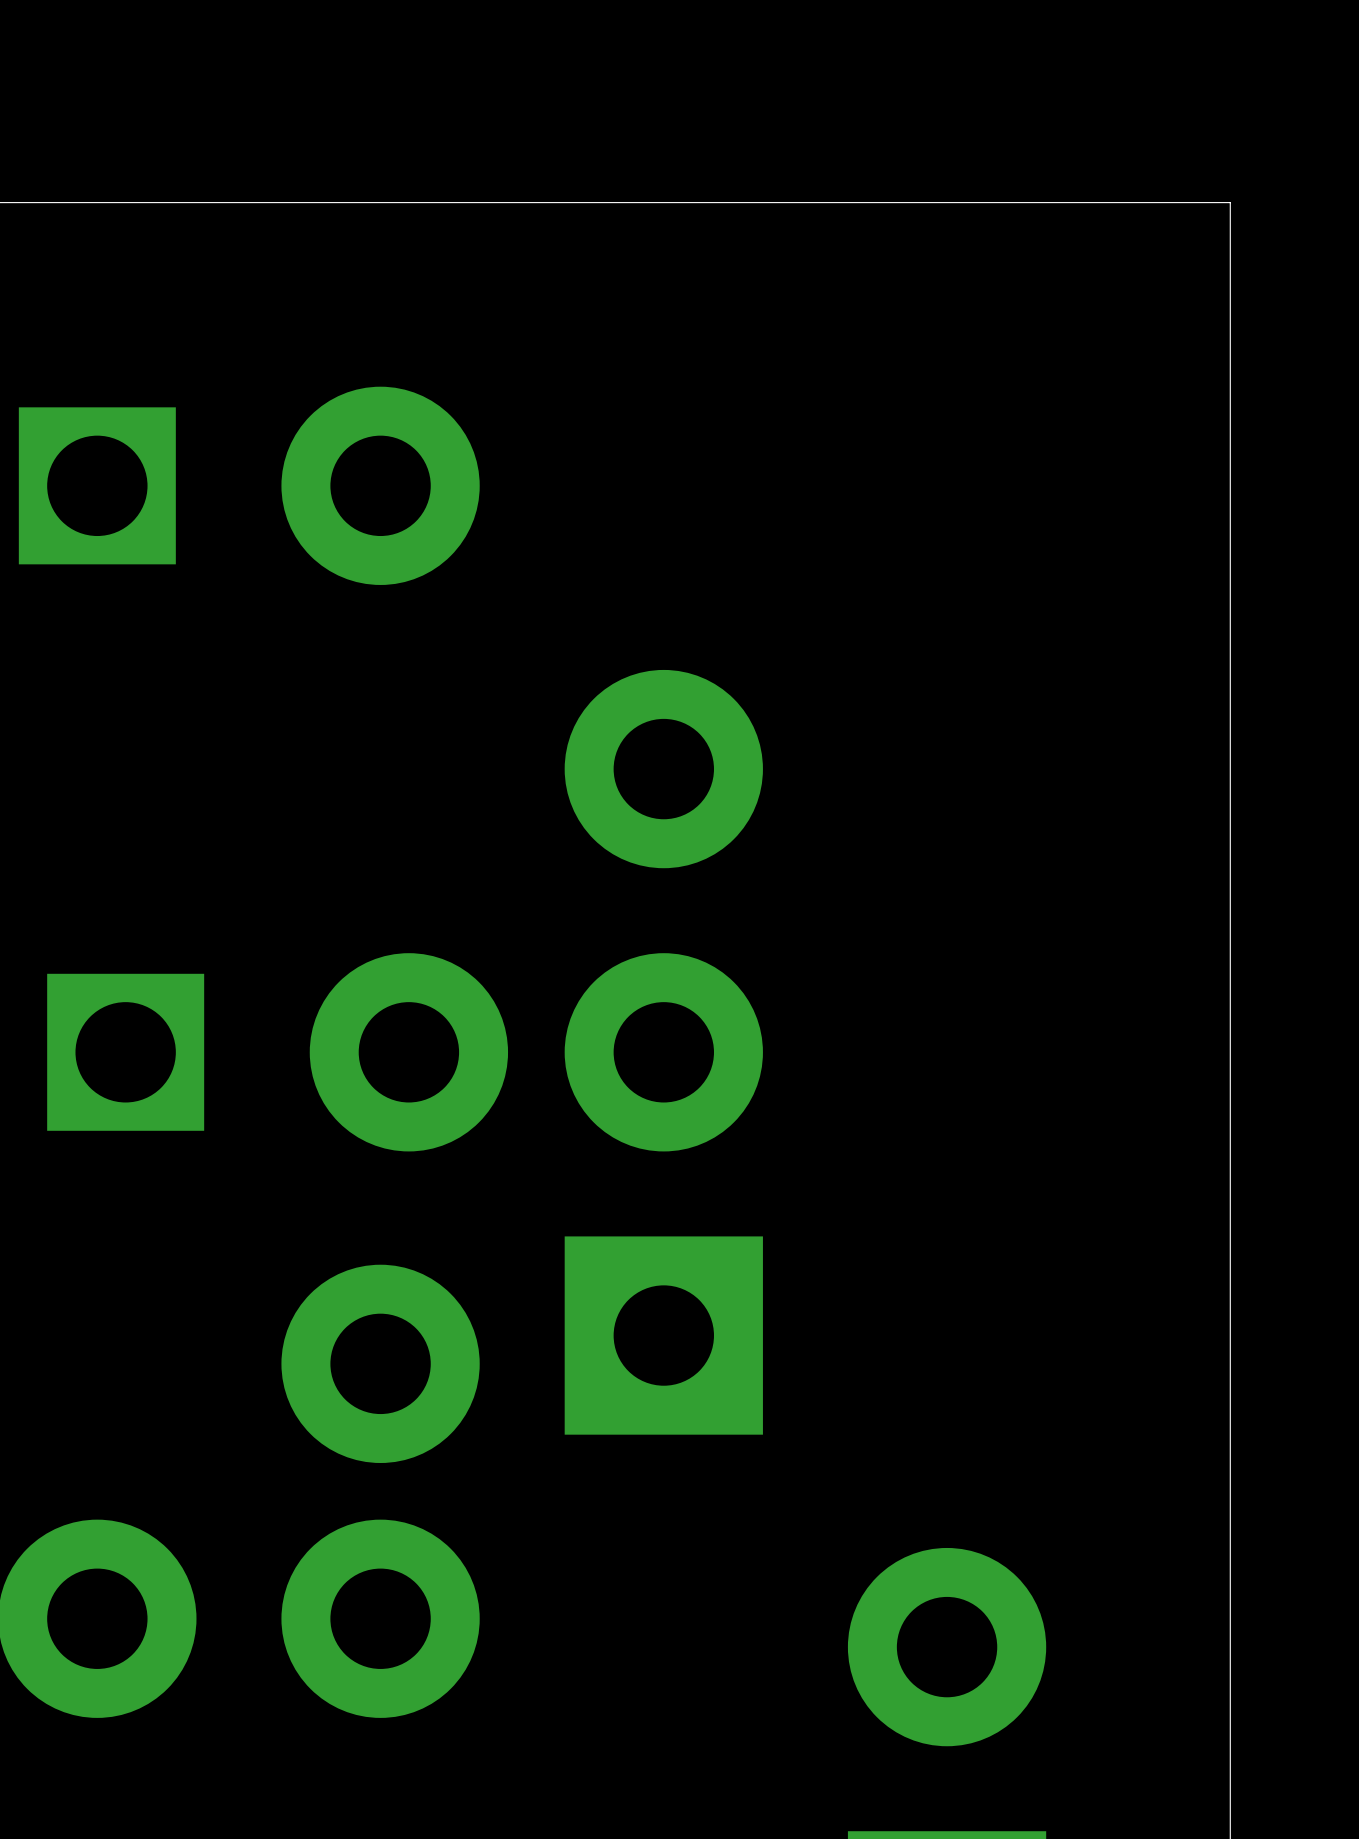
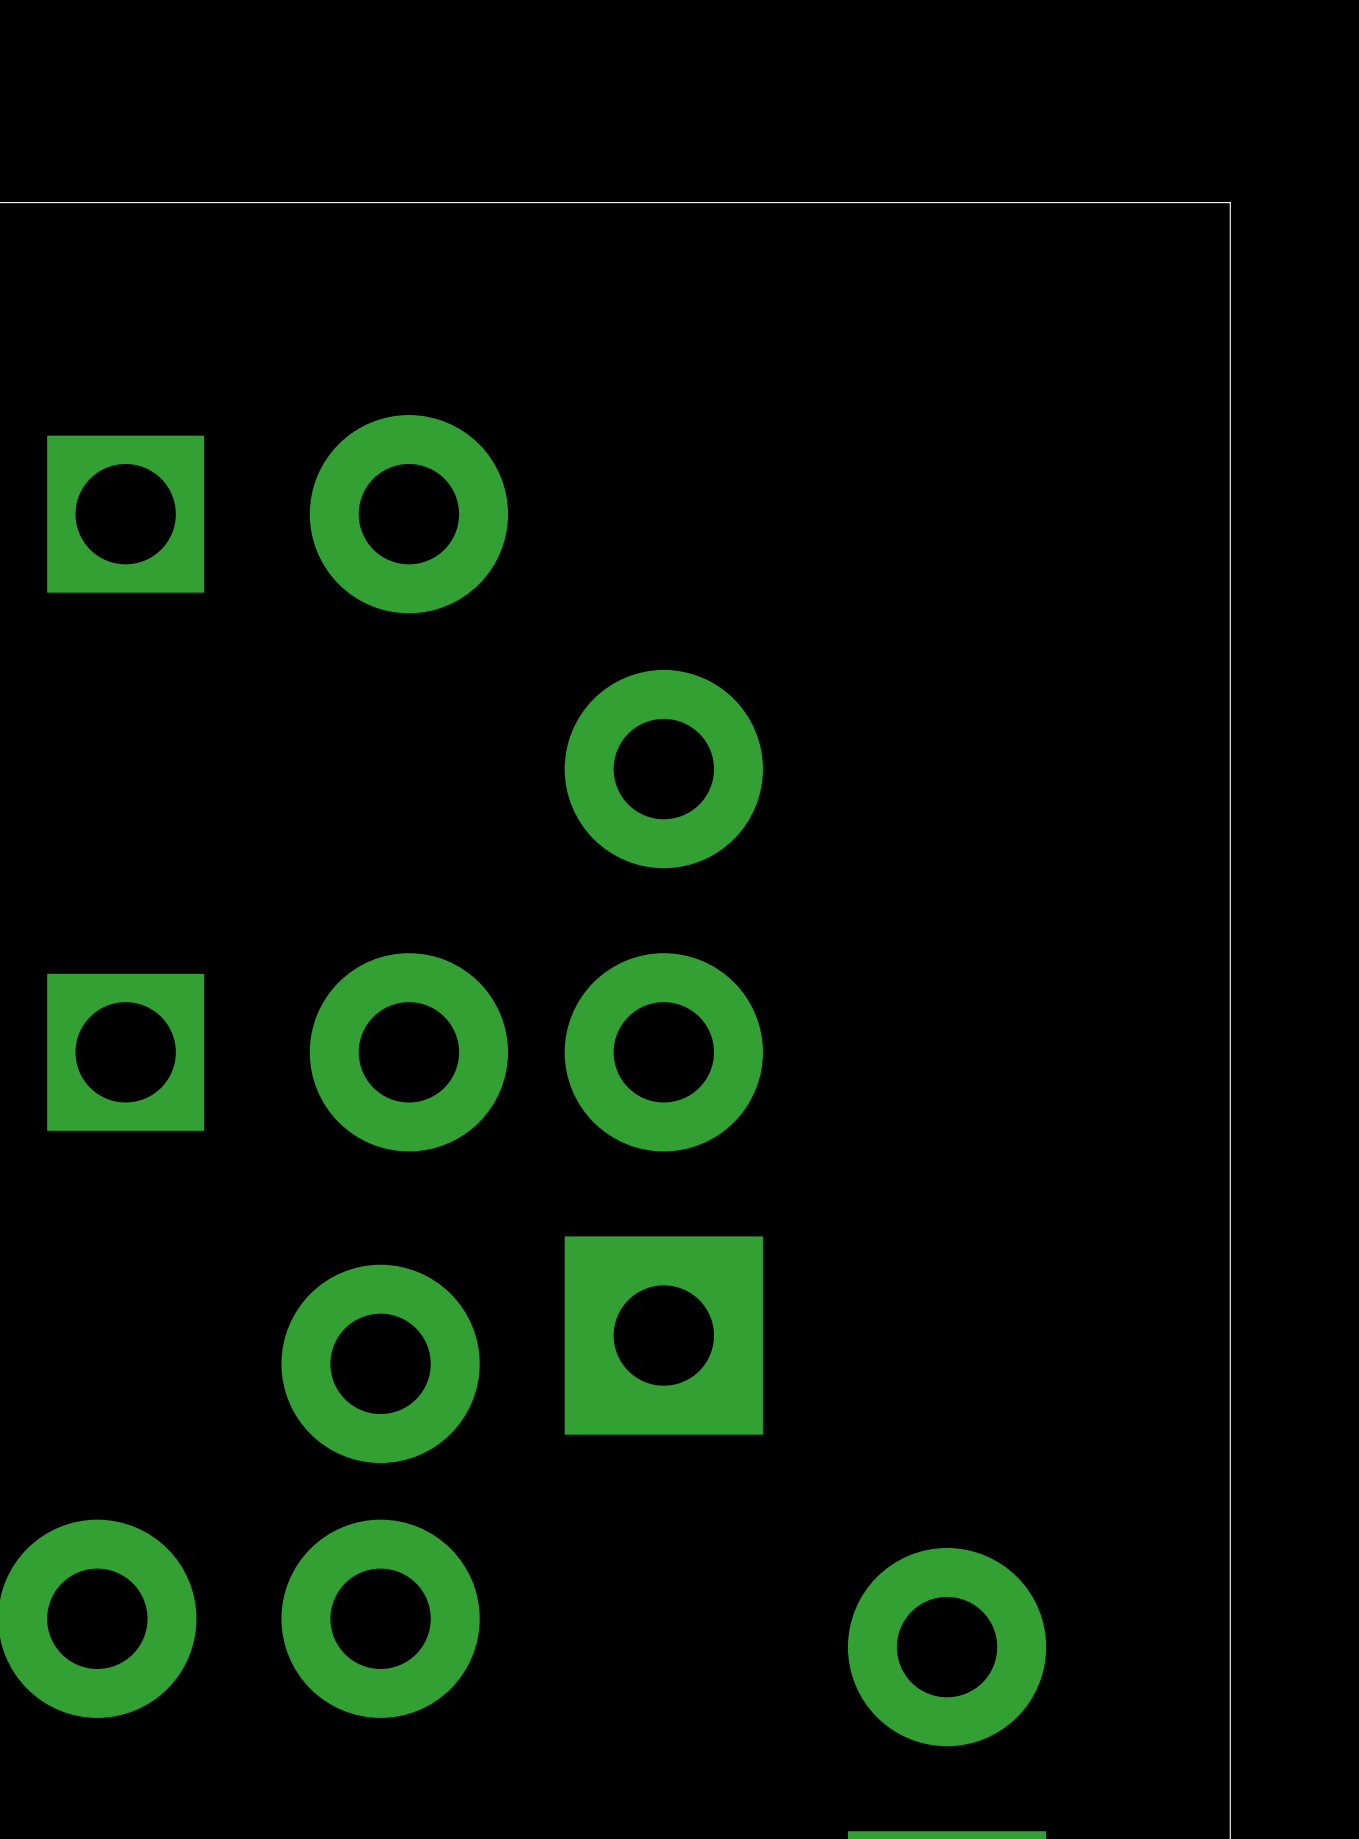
part position: (249, 485) -> (277, 514)

